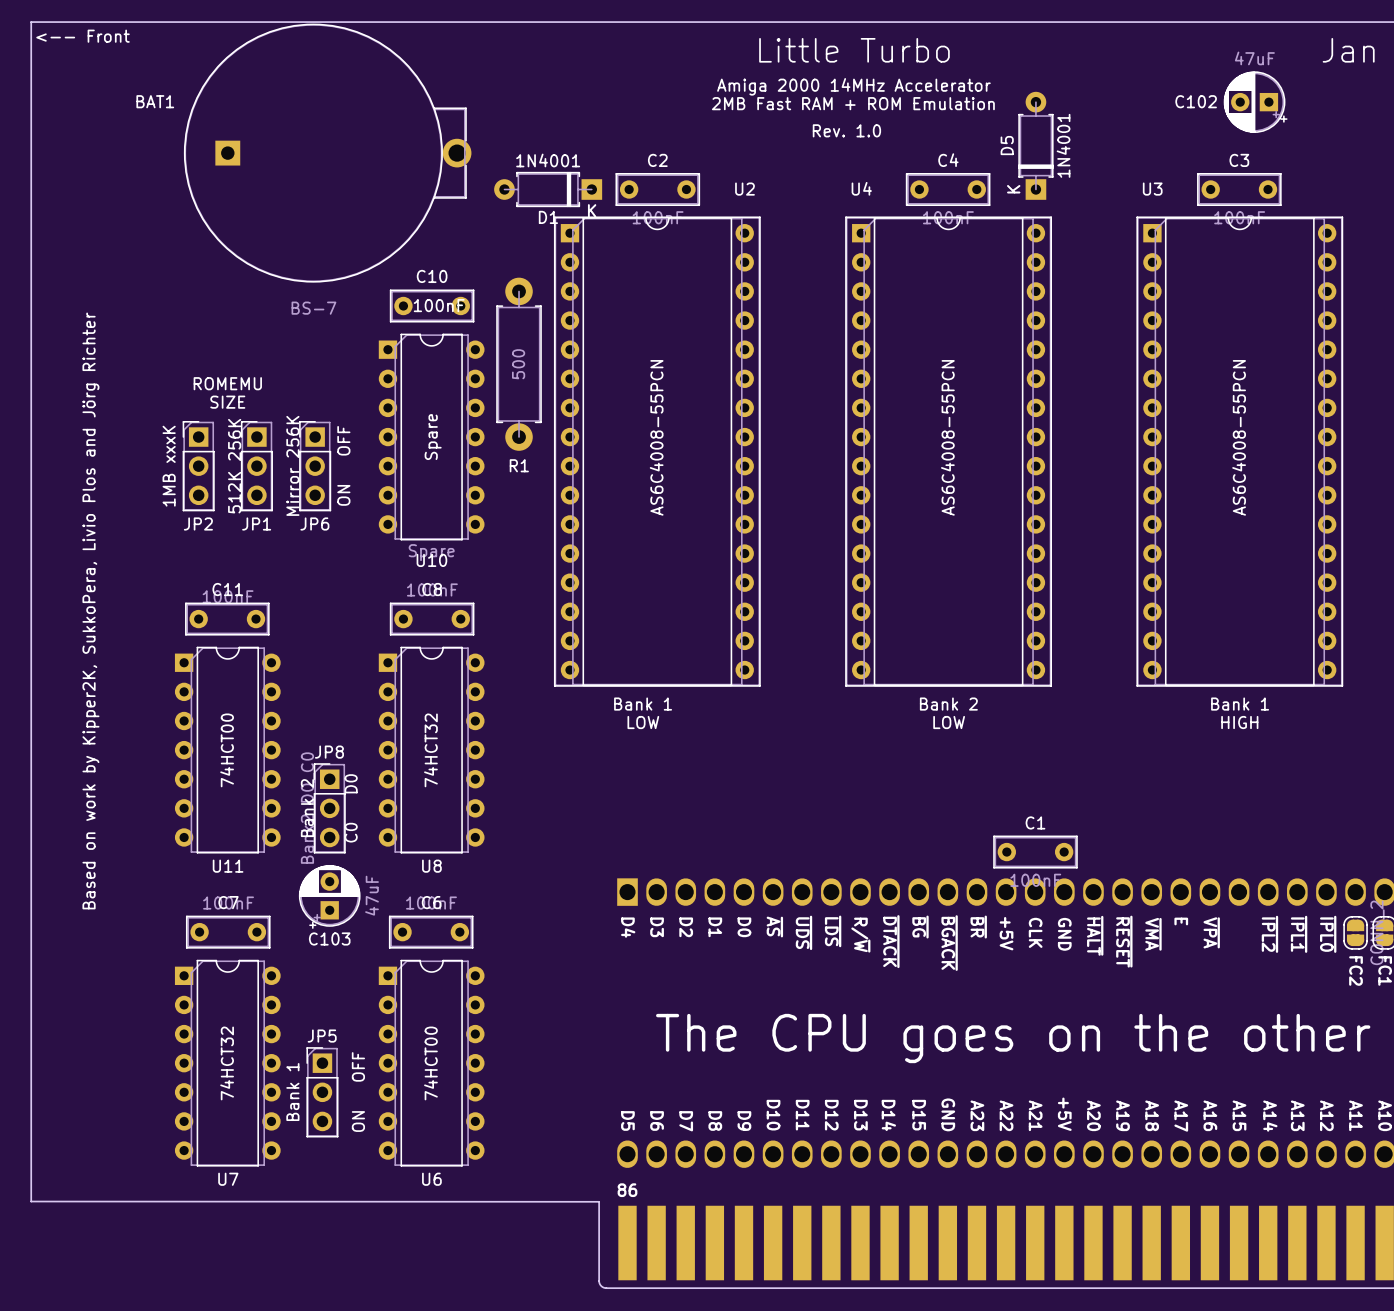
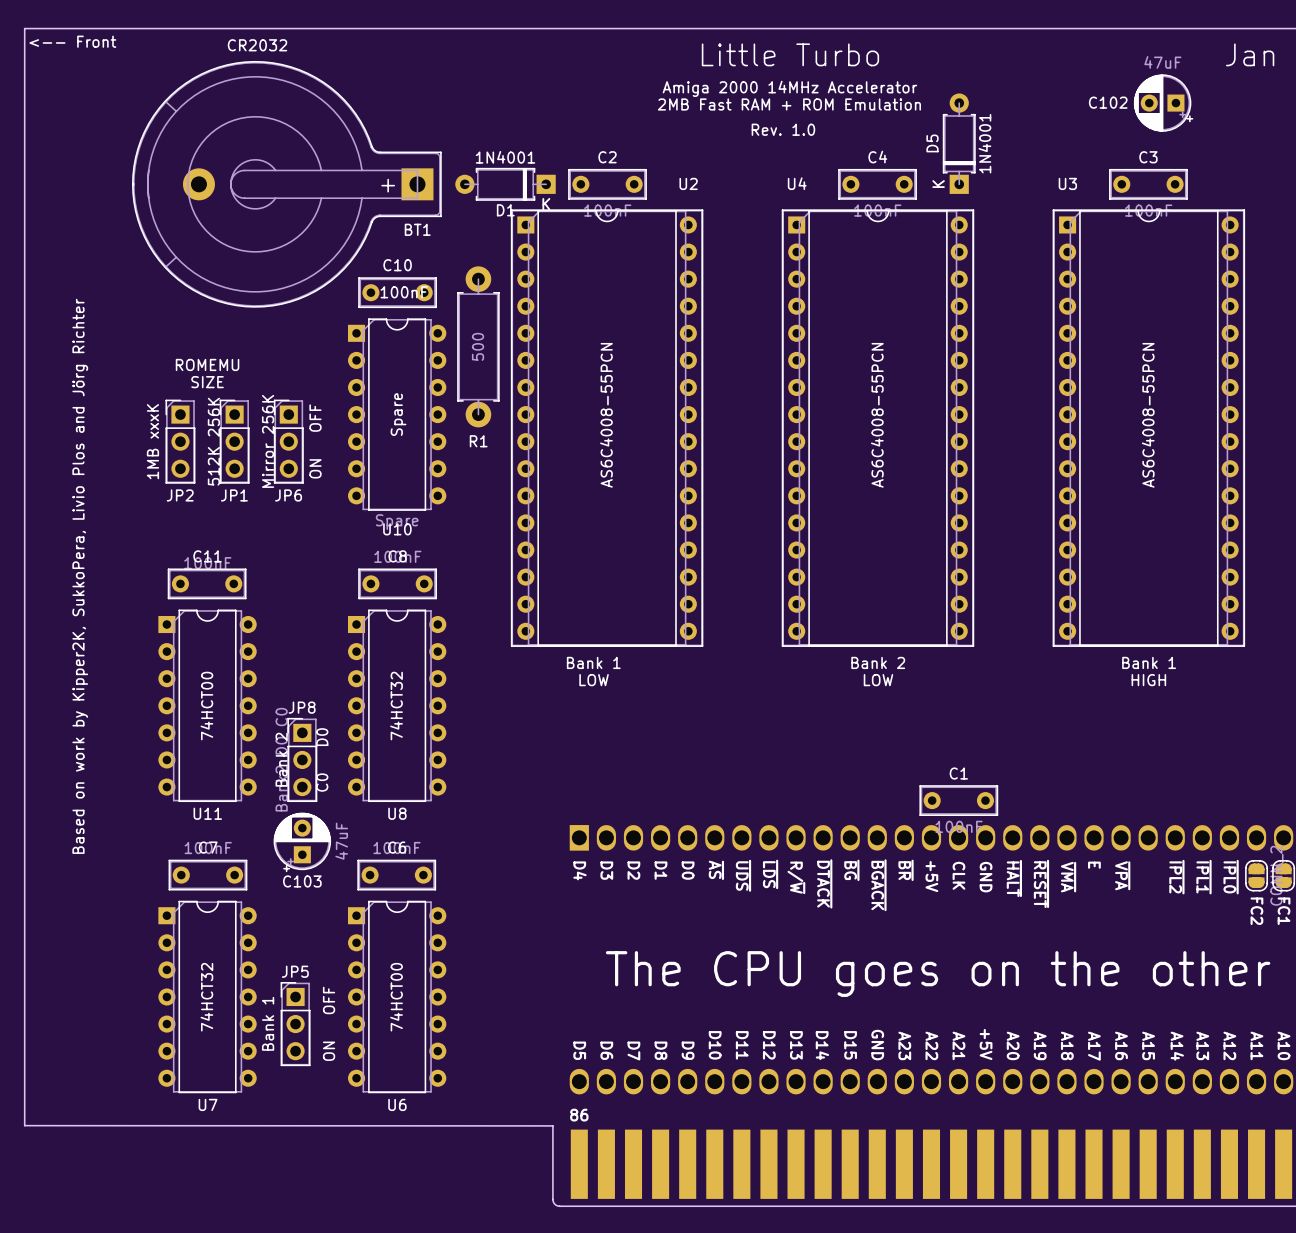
BAT1: BS-7 (327, 153) -> none
BT1: none -> CR2032 (286, 184)

